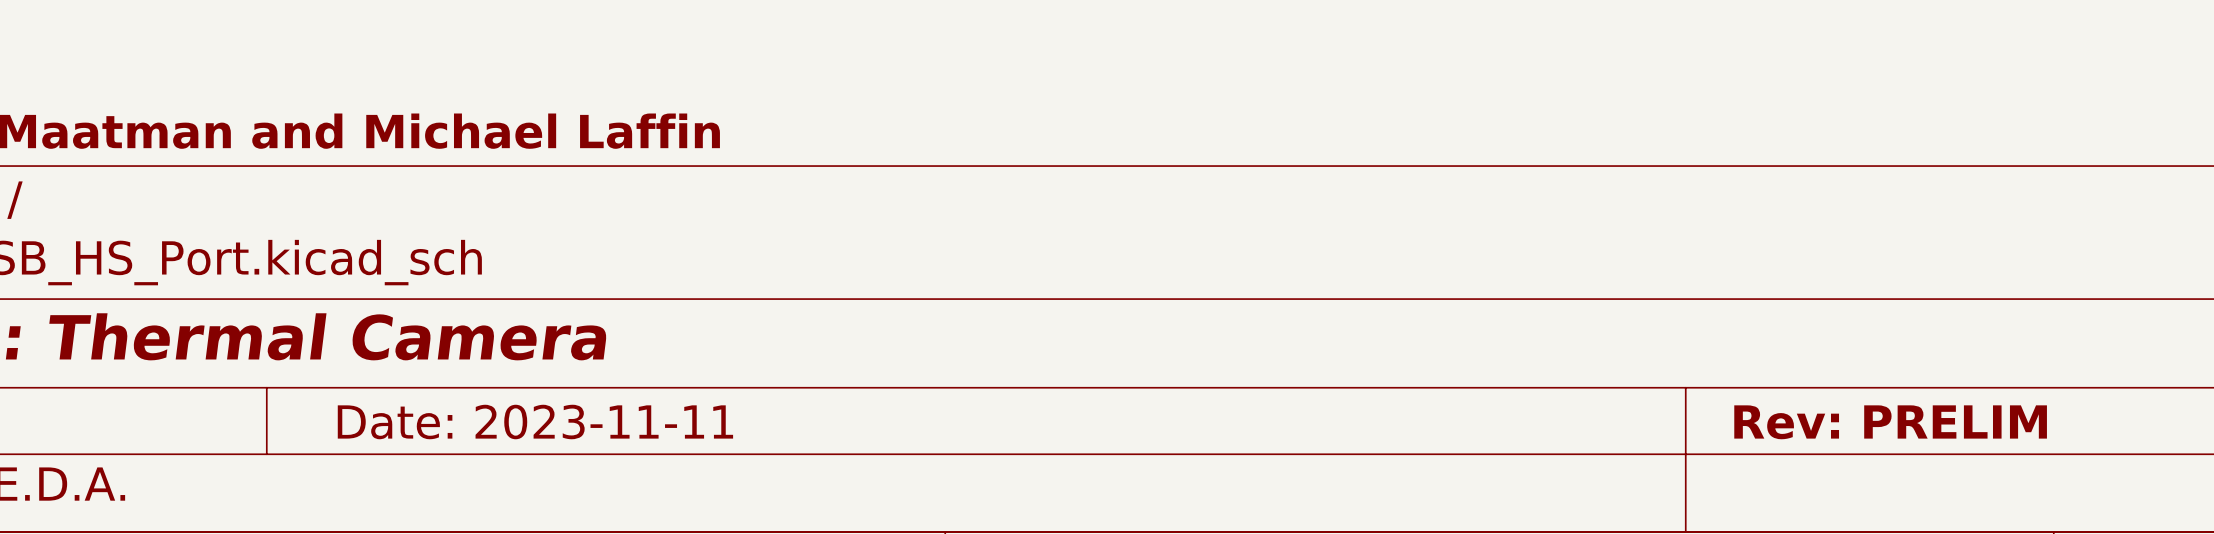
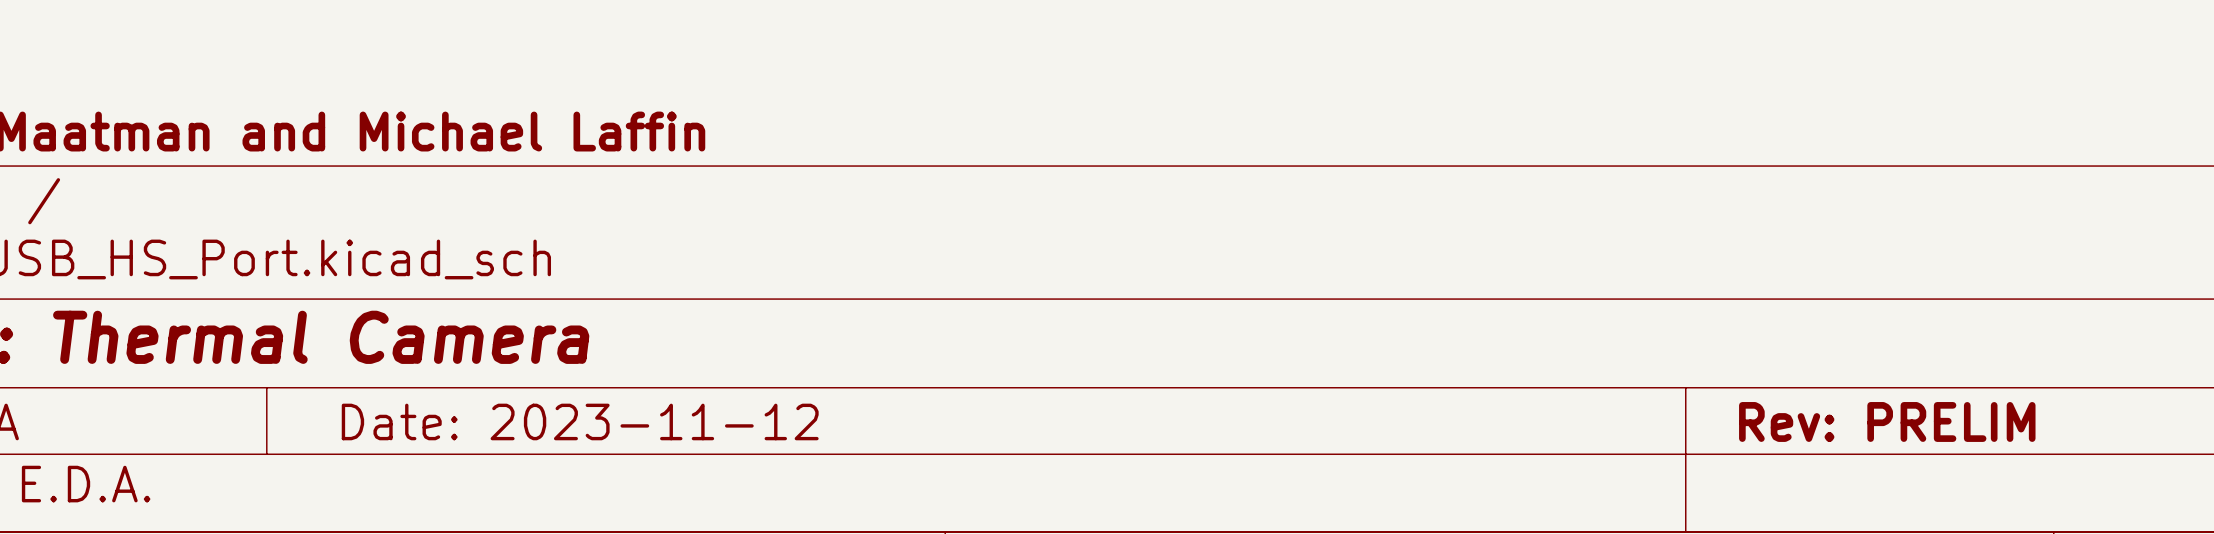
title block: Date: 2023-11-11 (535, 422) -> Date: 2023-11-12 (580, 421)

